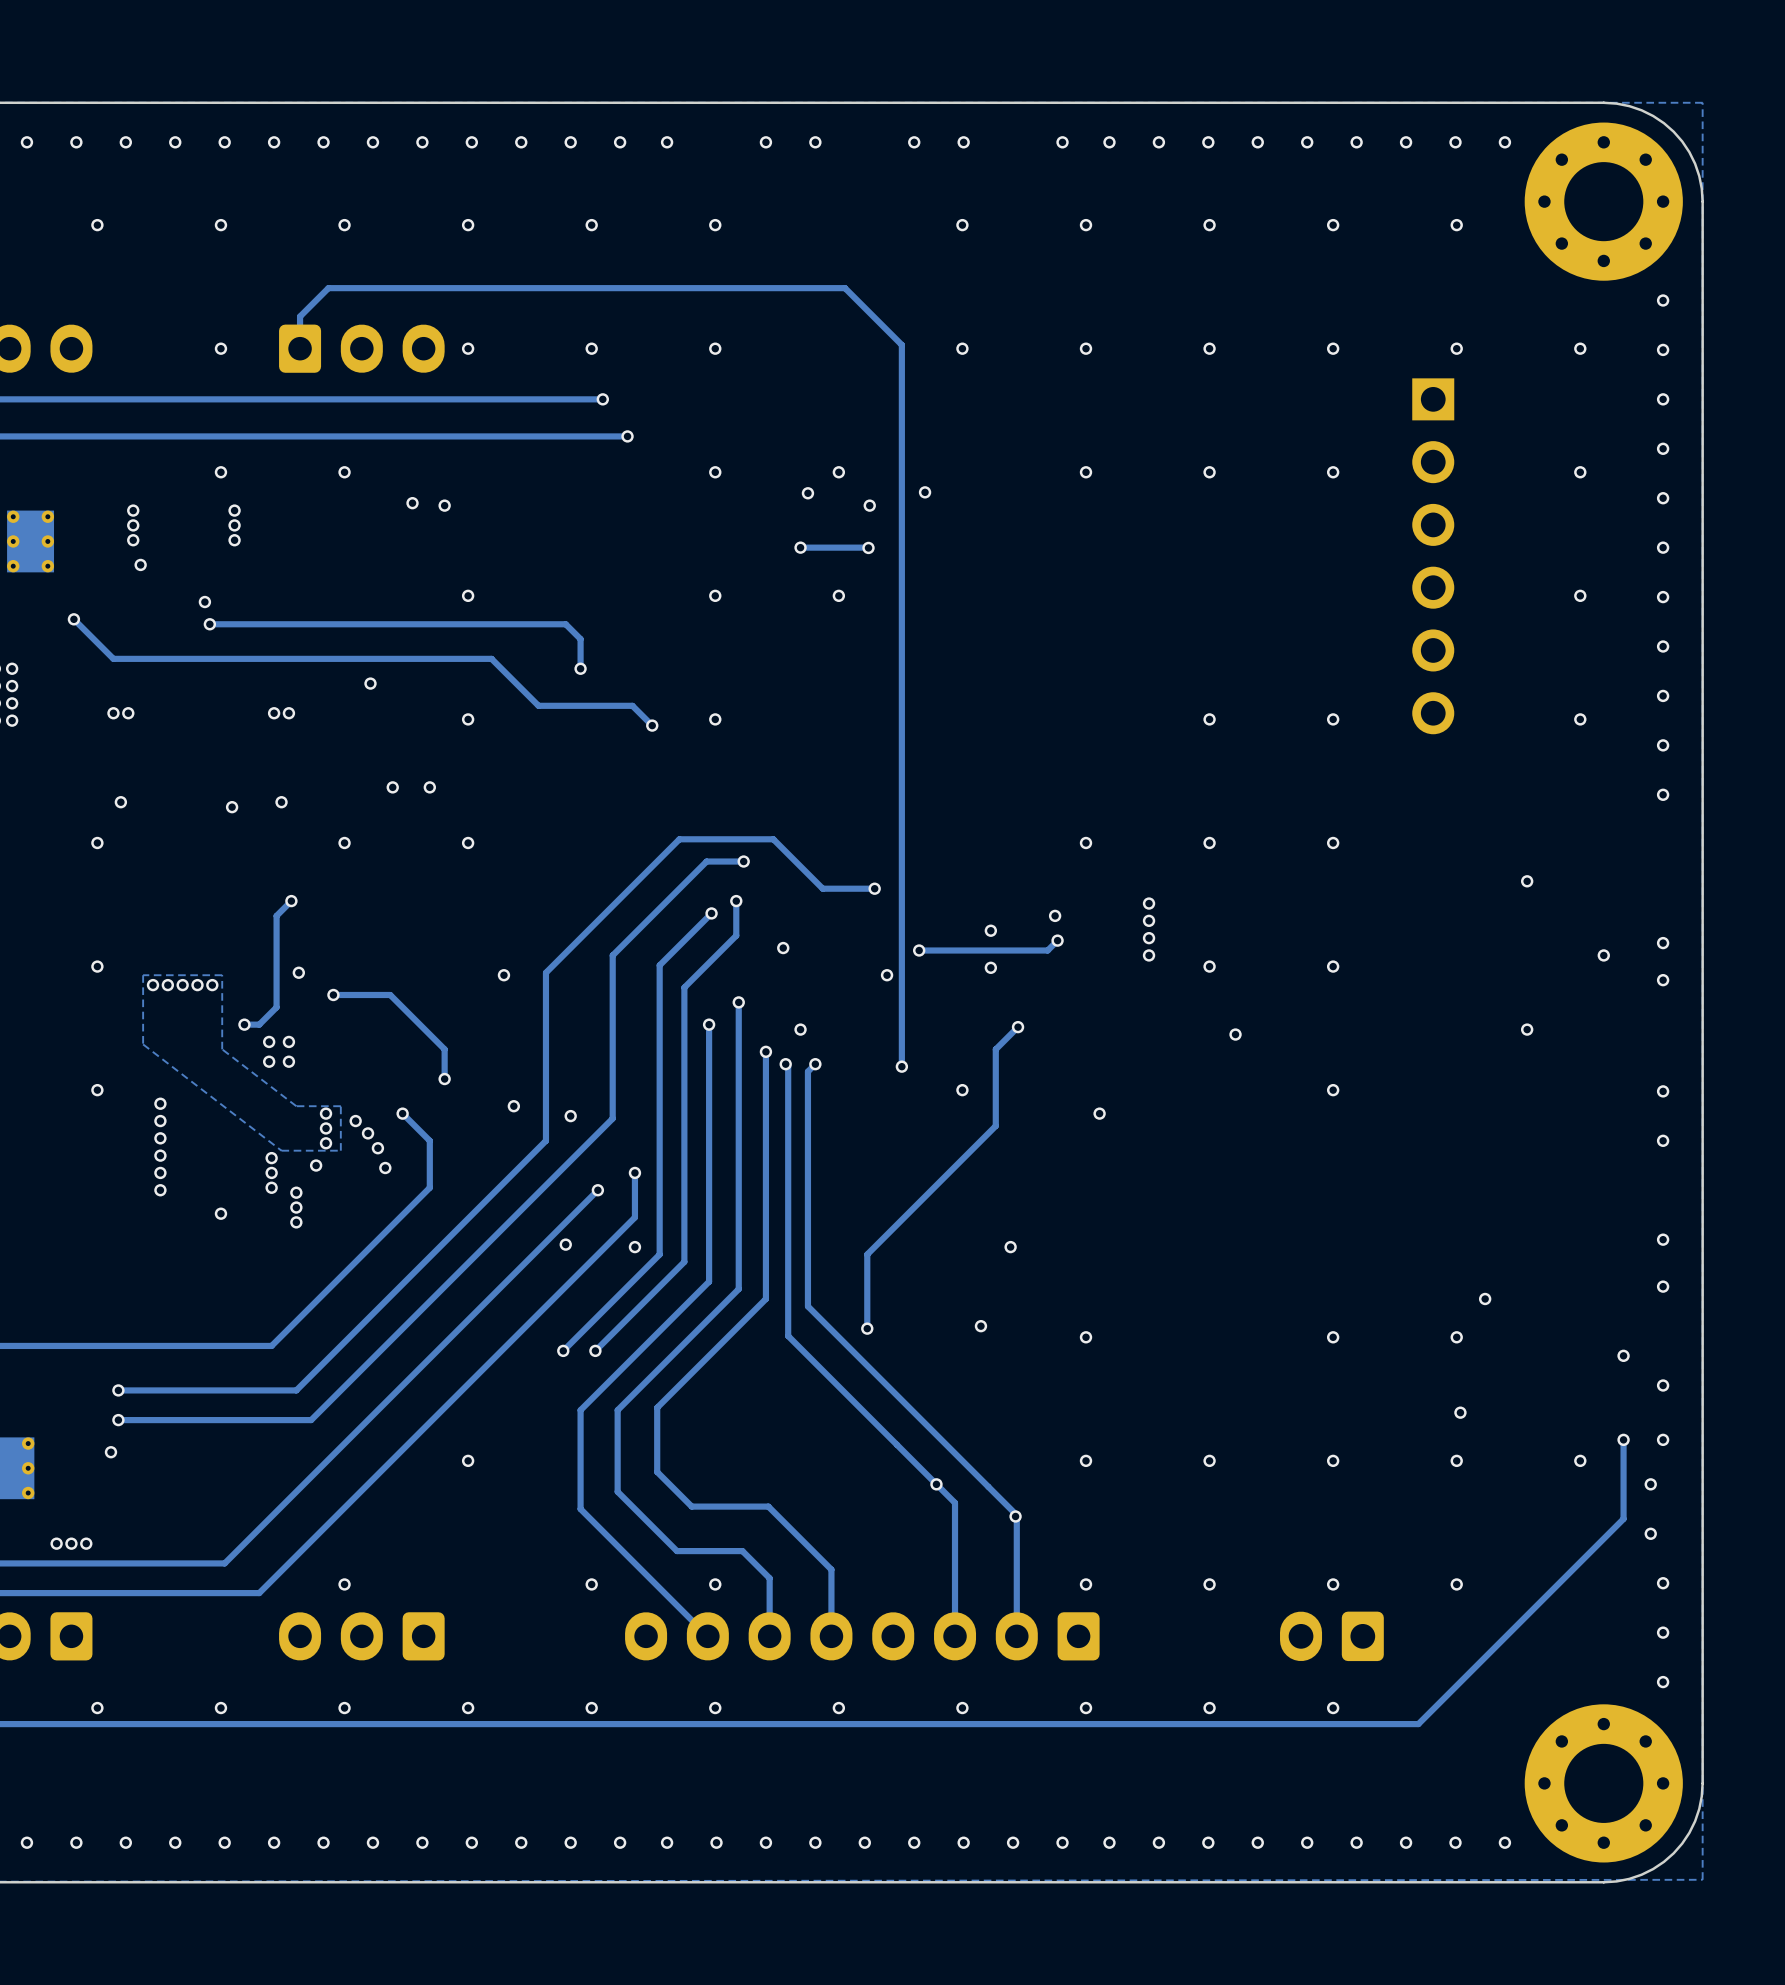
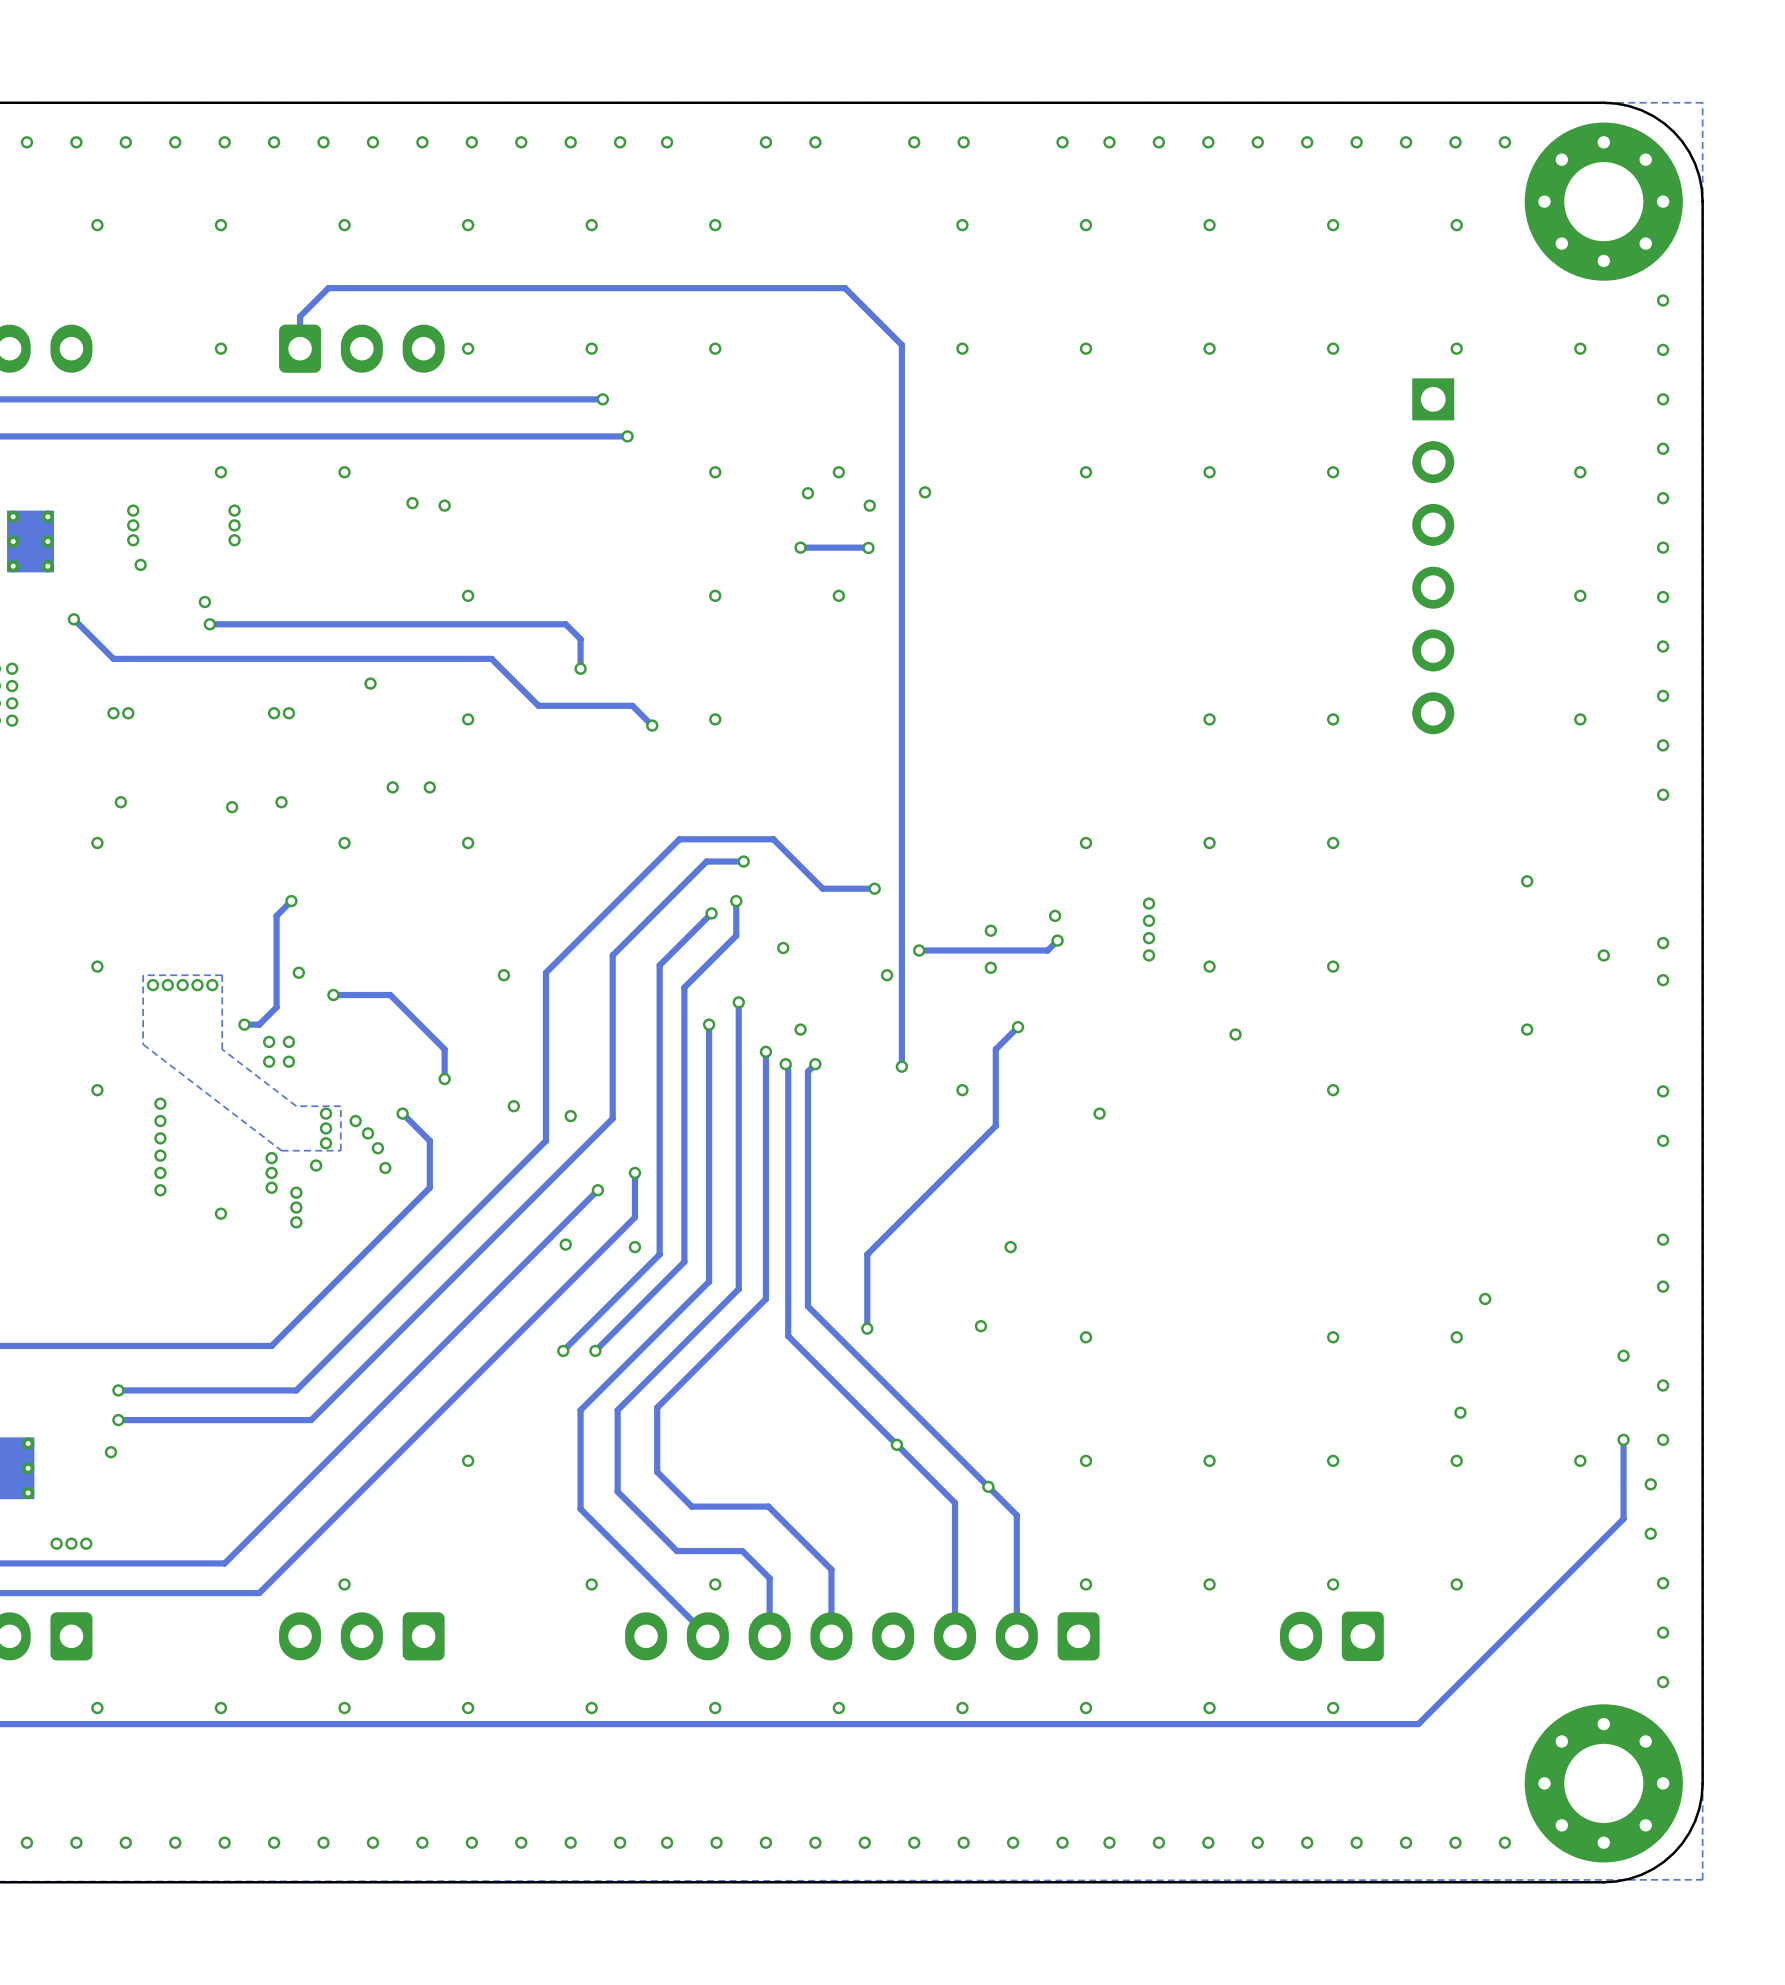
via: none -> (896, 1444)
via: (936, 1484) -> none
via: none -> (988, 1486)
via: (1015, 1516) -> none

